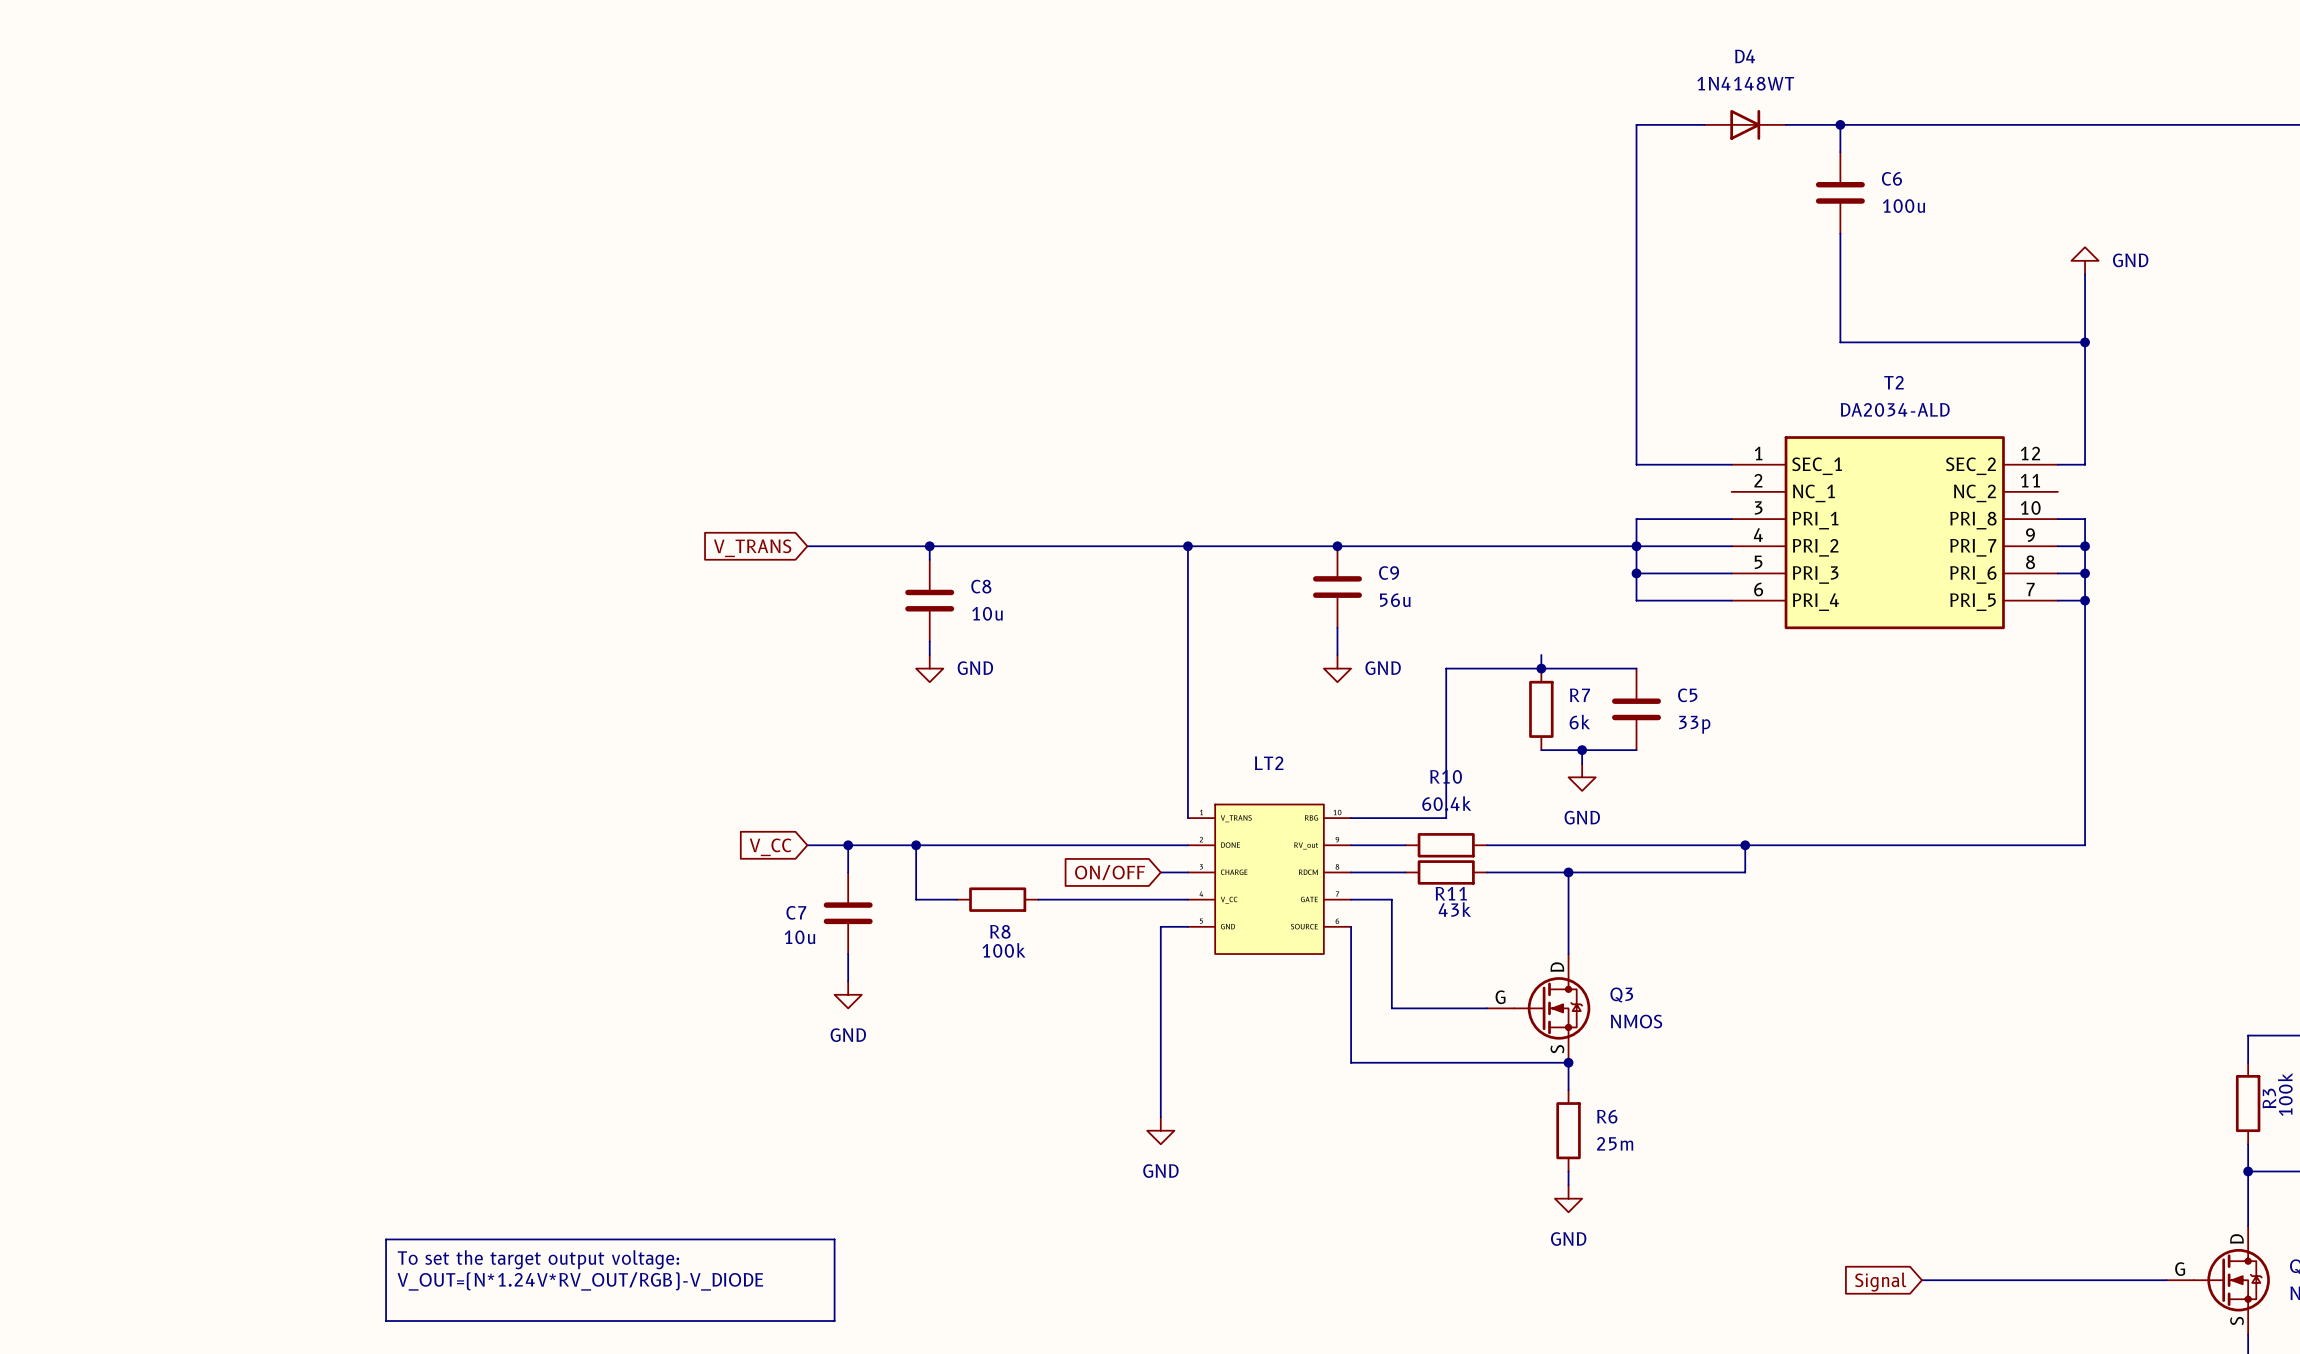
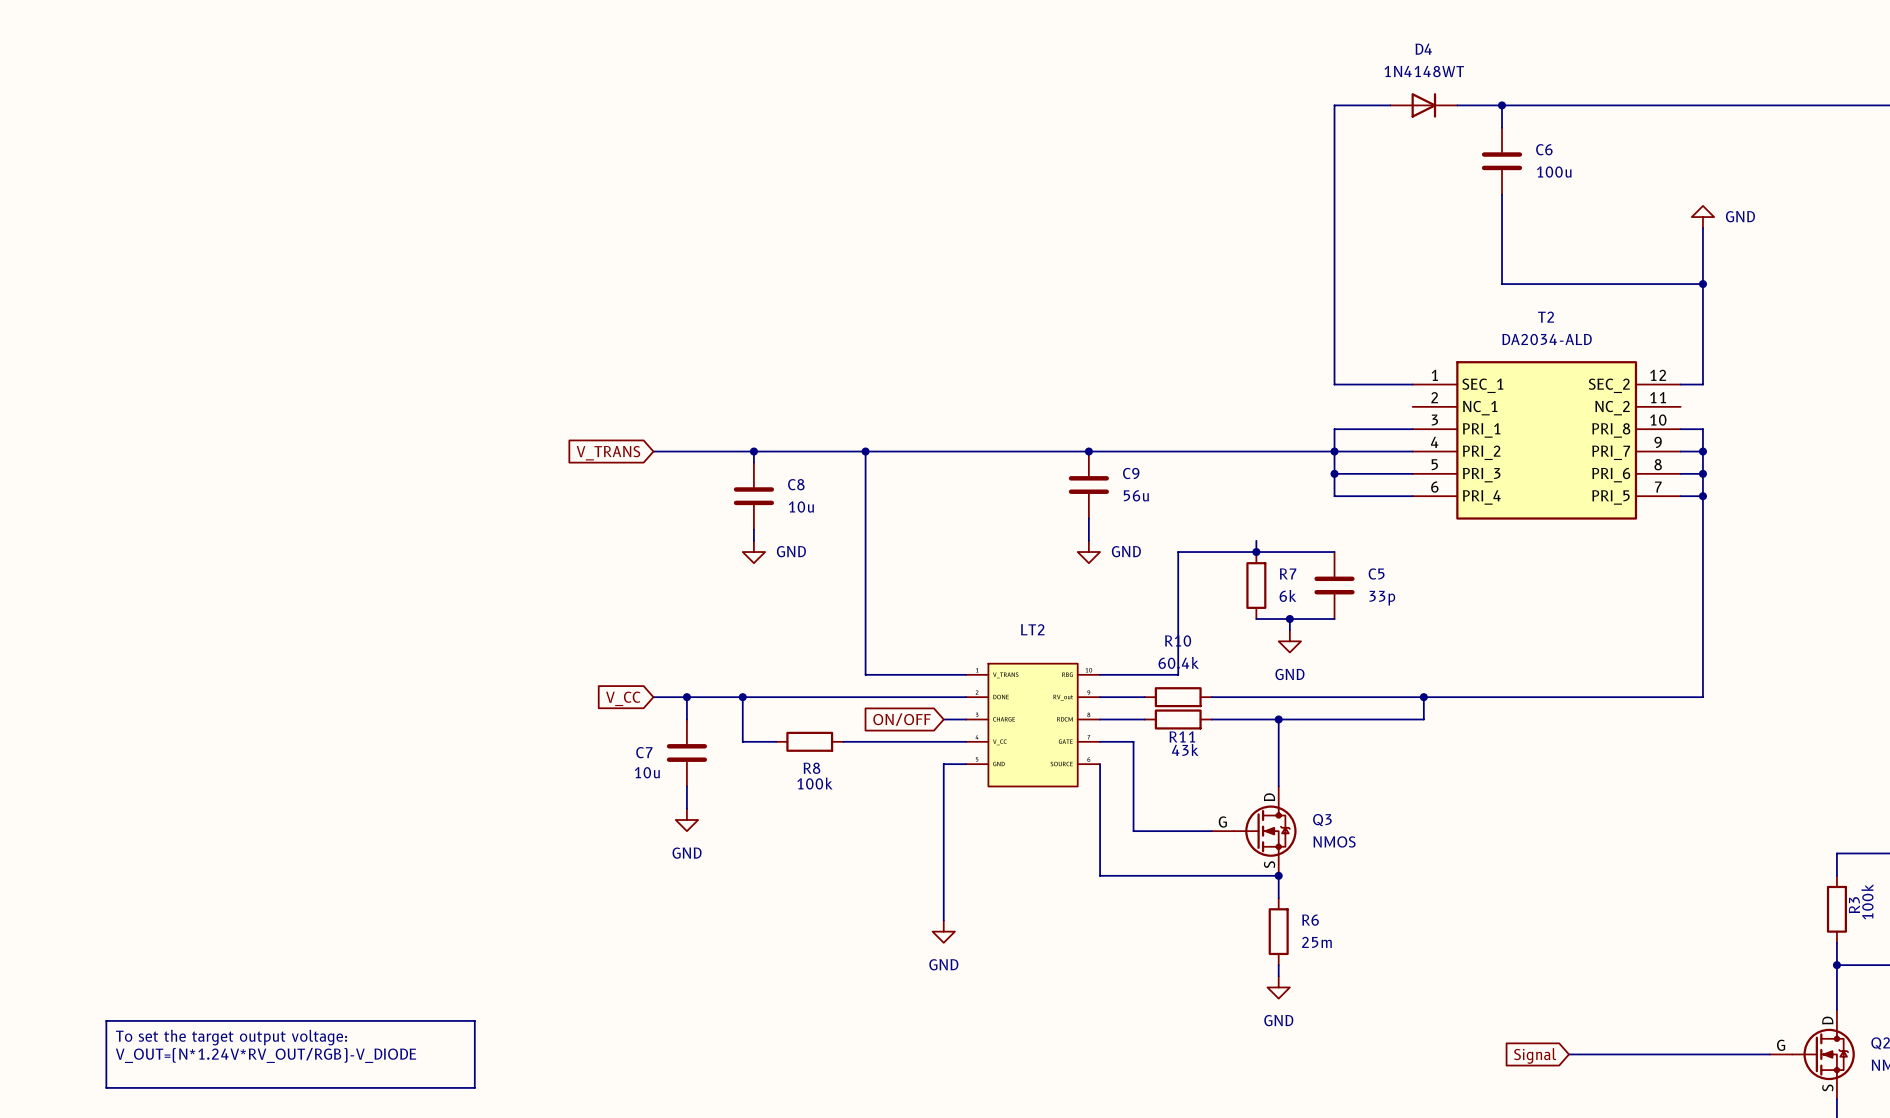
junction: none -> (865, 451)
wire: (1187, 546) (1187, 818) -> (865, 451) (865, 674) (966, 674)
junction: (1187, 546) -> none
line: (386, 1239) (386, 1321) -> (307, 1020) (106, 1020) (106, 1087) (307, 1087)
line: (589, 1239) (834, 1239) (834, 1321) (589, 1321) -> (474, 1020) (474, 1087)
text position: To set the target output voltage: (538, 1259) -> To set the target output voltage: (231, 1037)
text position: V_OUT=(N*1.24V*RV_OUT/RGB)-V_DIODE (580, 1281) -> V_OUT=(N*1.24V*RV_OUT/RGB)-V_DIODE (266, 1055)

